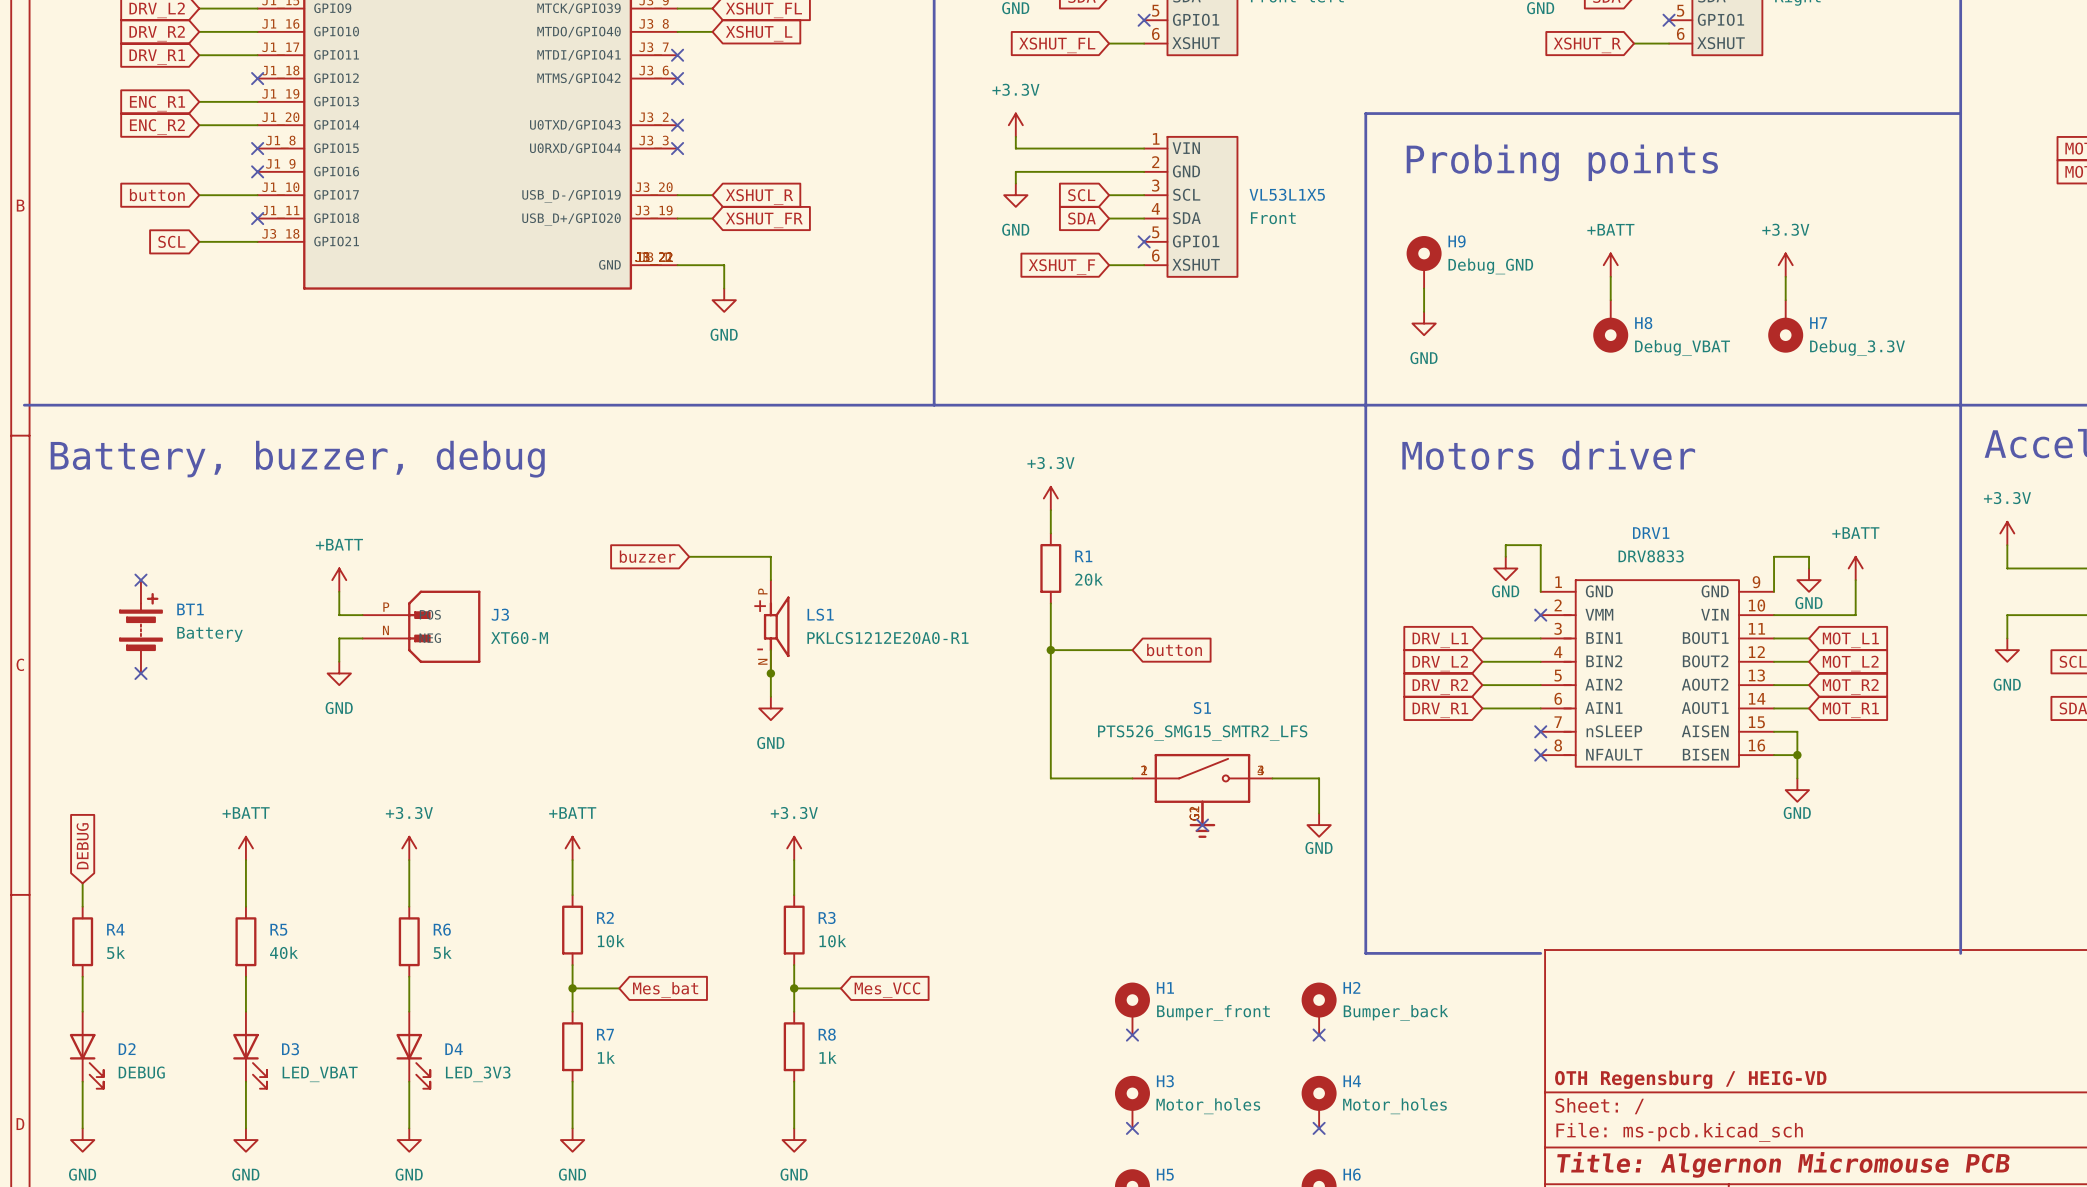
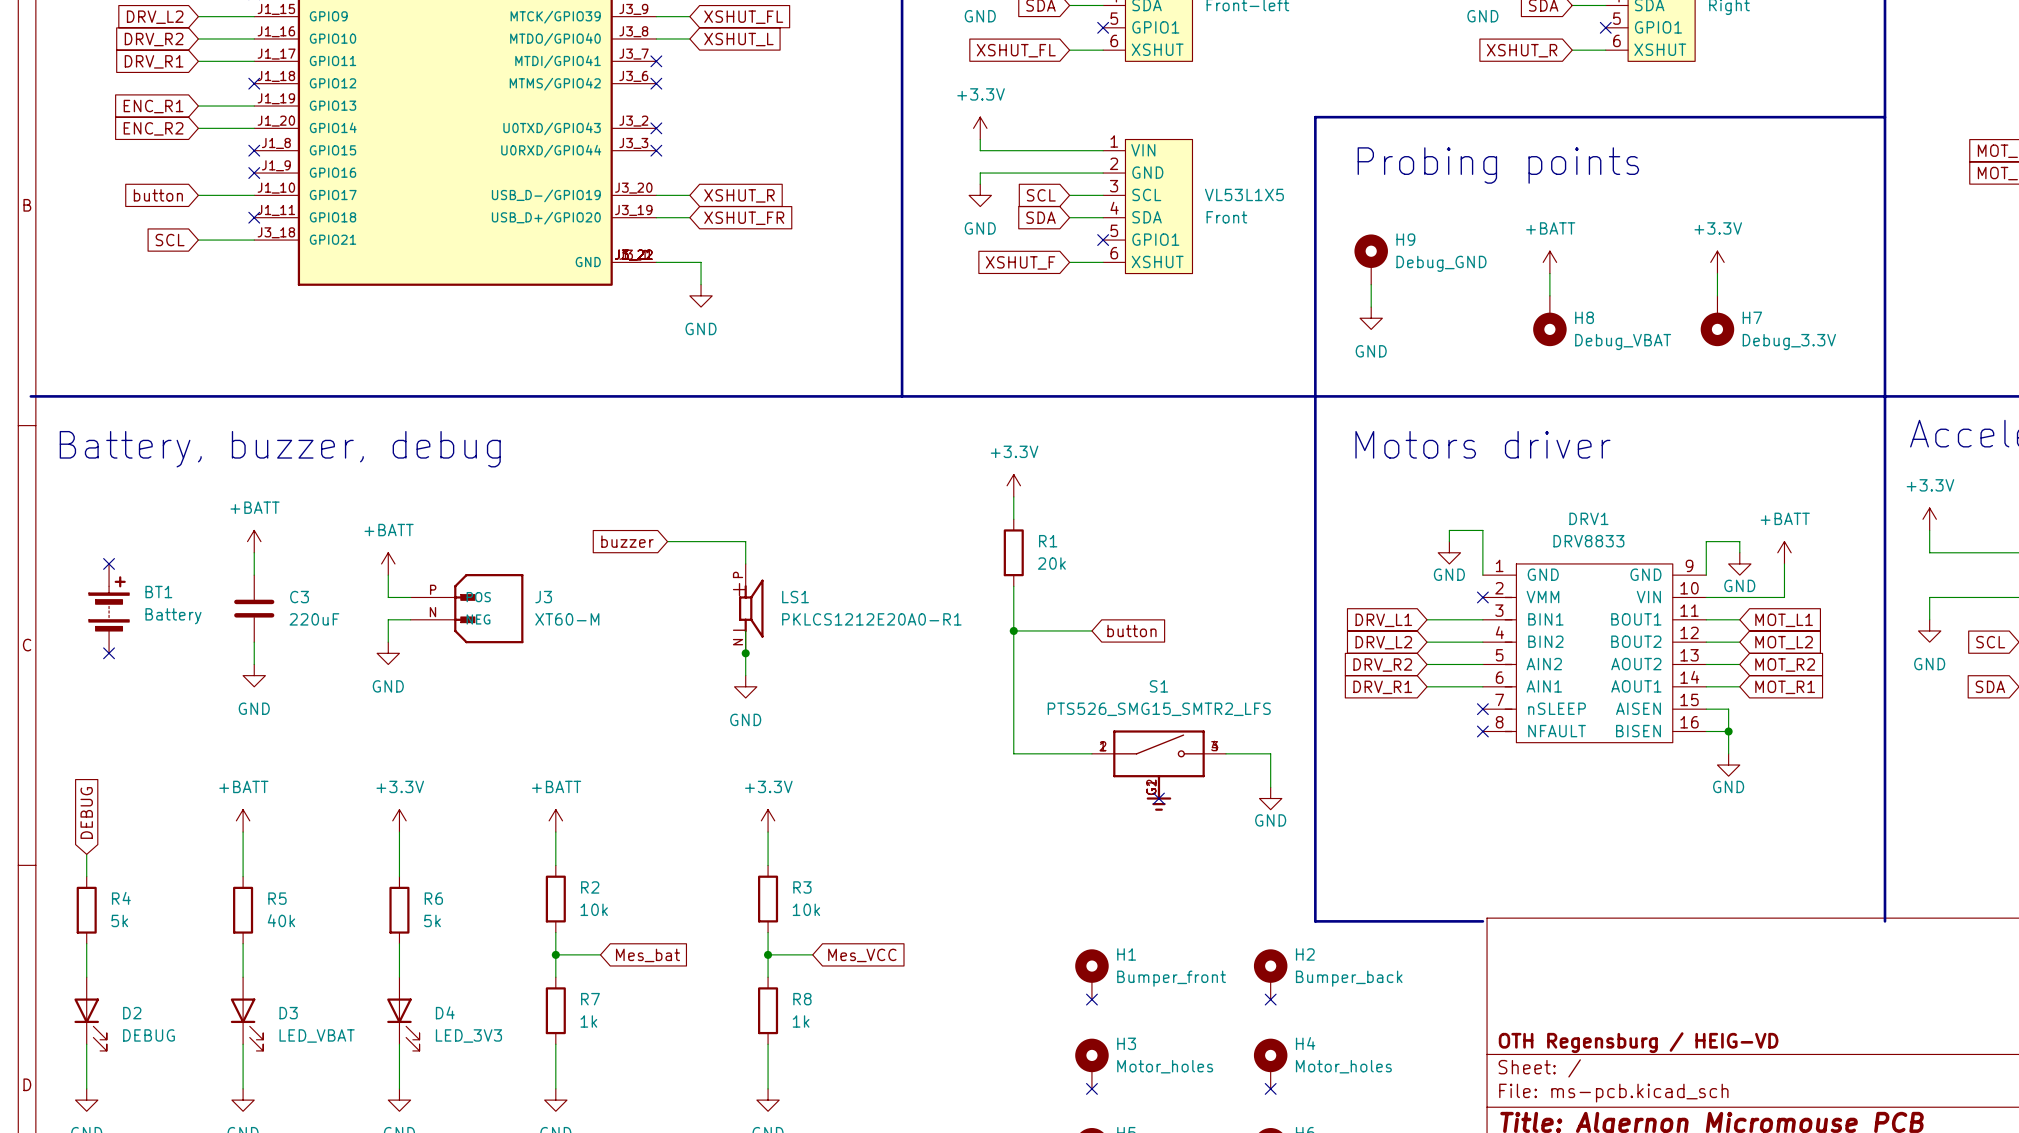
power symbol: none -> +BATT (254, 541)
wire: none -> (254, 552) (254, 575)
no-connect mark position: (140, 580) -> (109, 563)
power symbol: +BATT (339, 580) -> none
power symbol: none -> +BATT (388, 563)
wire: (339, 591) (339, 615) (362, 615) -> (388, 575) (388, 597) (410, 597)
BT1 position: (140, 626) -> (109, 608)
C3: none -> 220uF (254, 608)
J3 position: (421, 626) -> (467, 608)
wire: (362, 638) (339, 638) (339, 661) -> (410, 619) (388, 619) (388, 642)
wire: none -> (254, 642) (254, 664)
no-connect mark position: (140, 673) -> (109, 653)
power symbol: GND (339, 673) -> none
power symbol: none -> GND (388, 653)
power symbol: none -> GND (254, 675)

